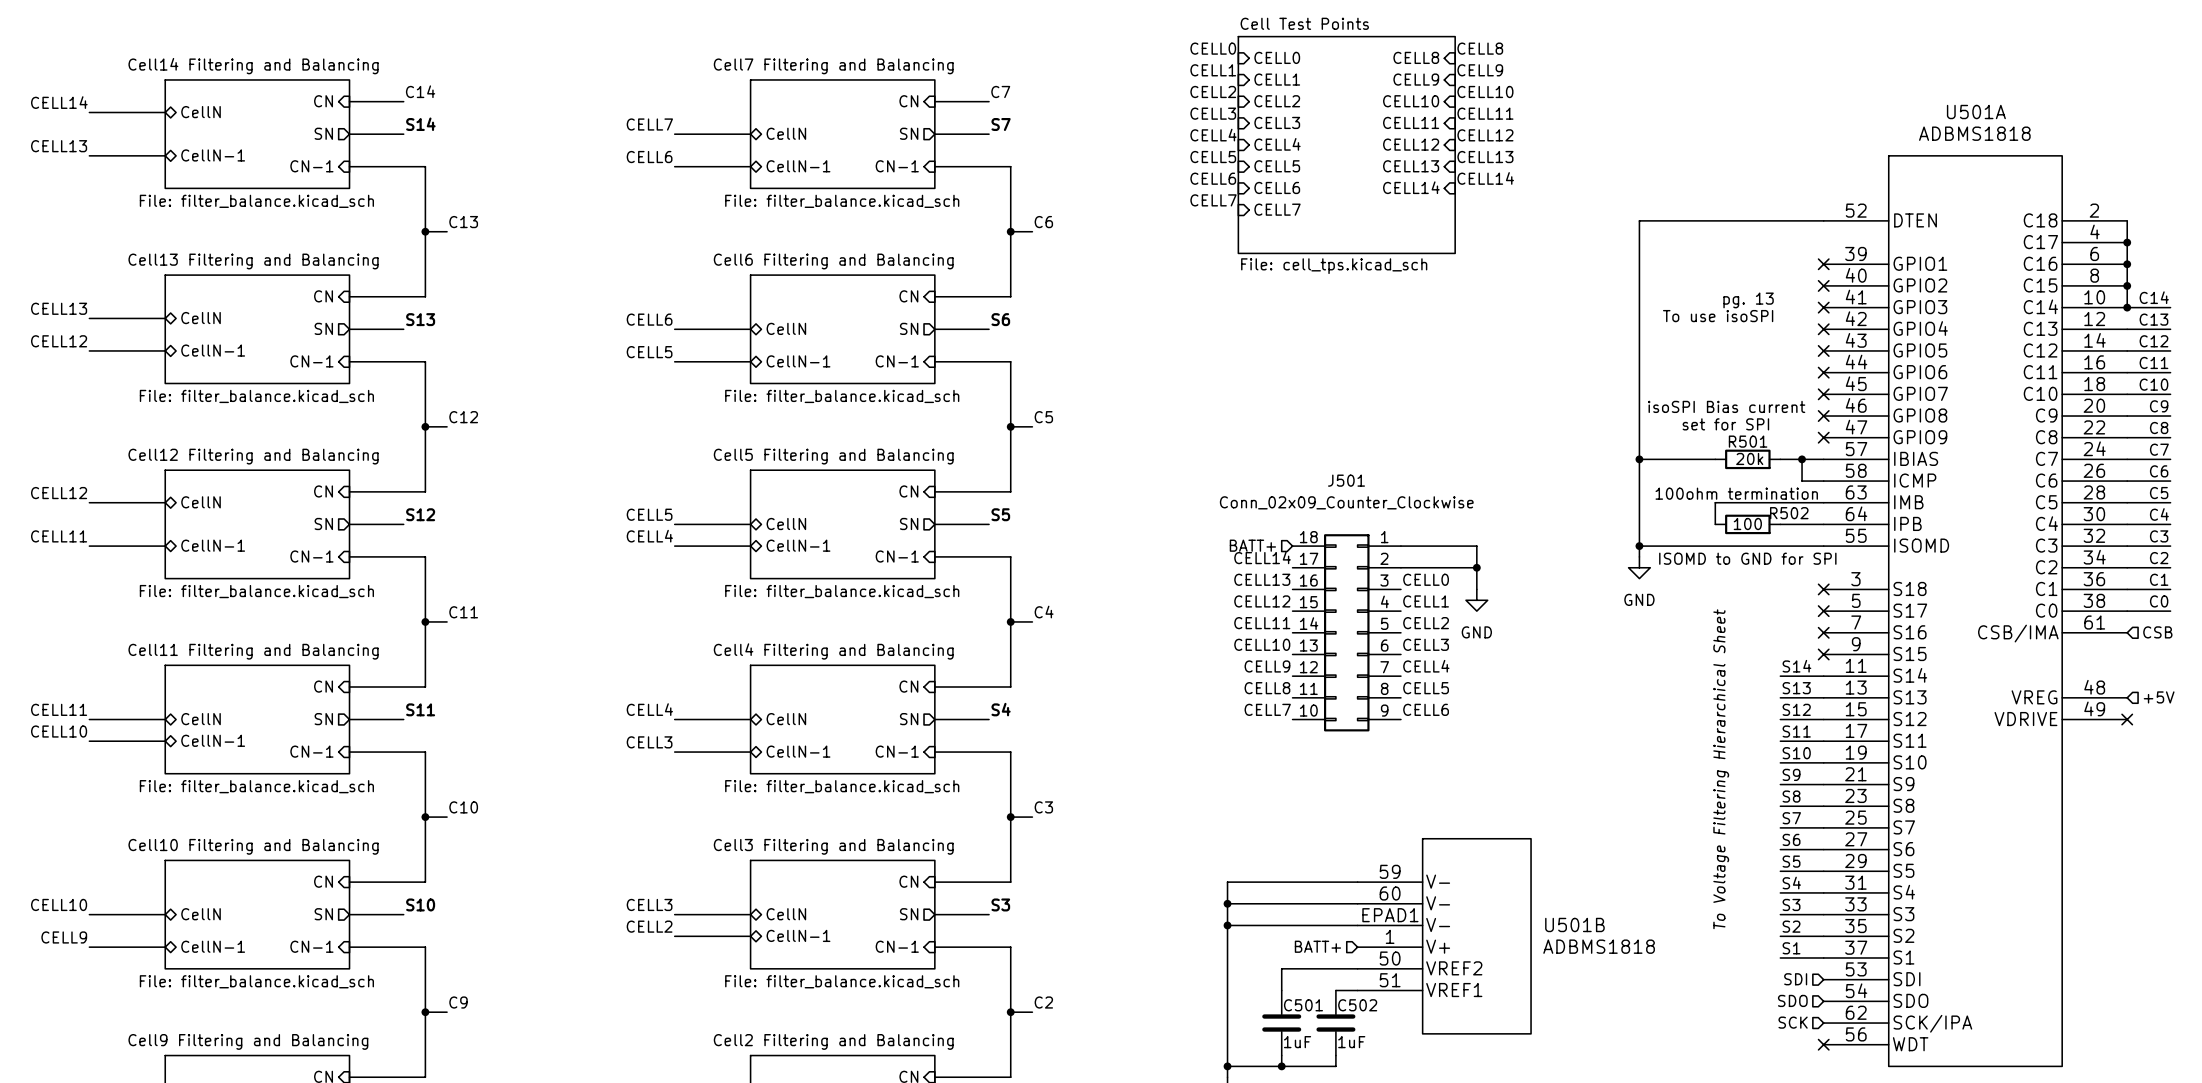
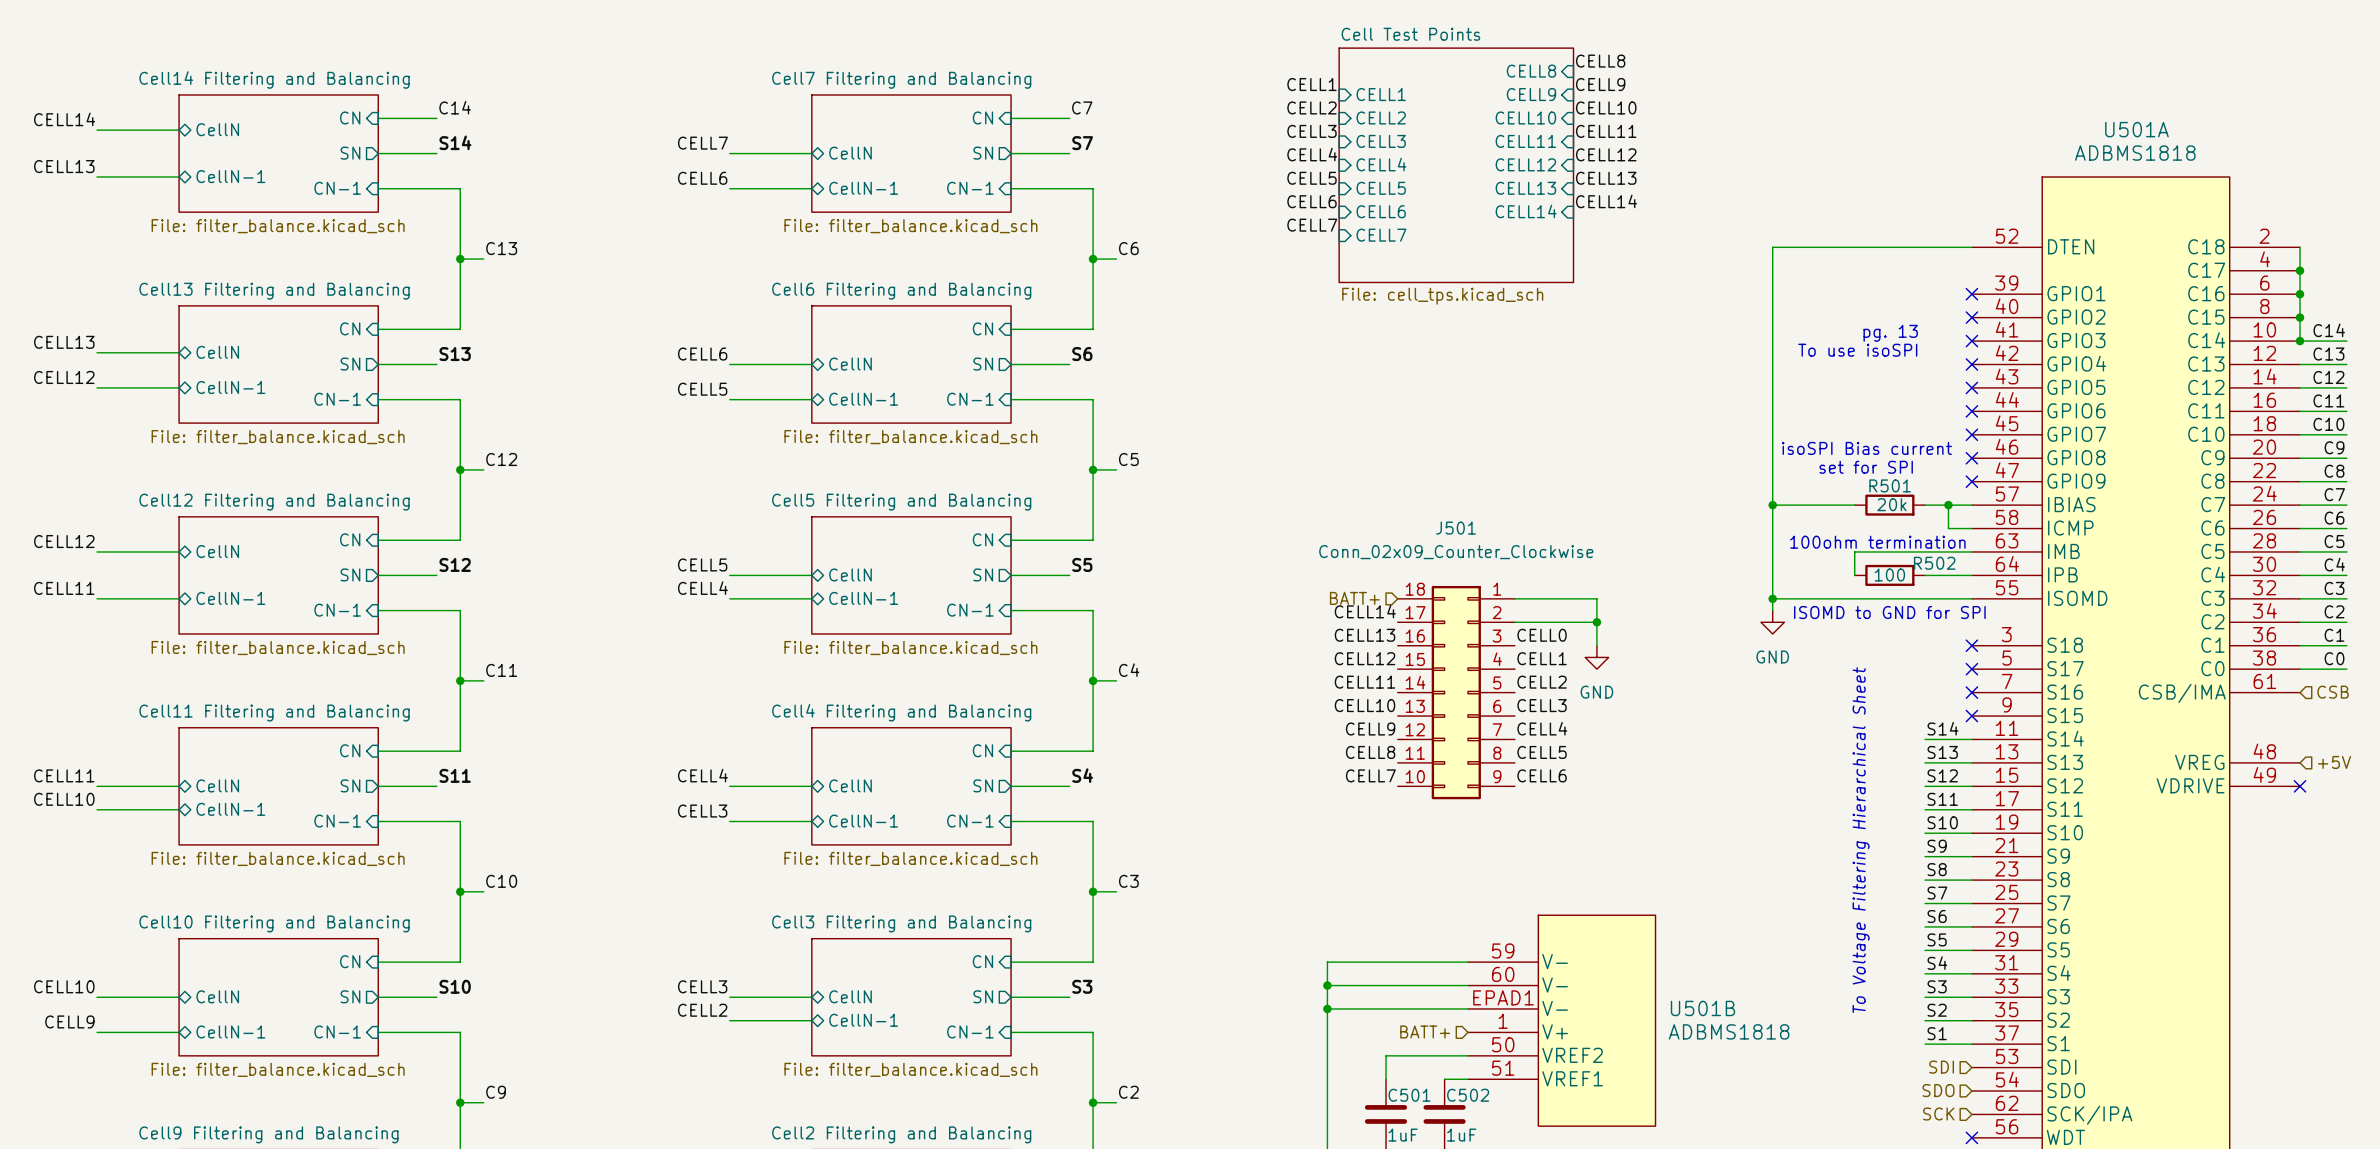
label: CELL0 (1213, 48) -> none
sheet pin: CELL0 (1277, 57) -> none

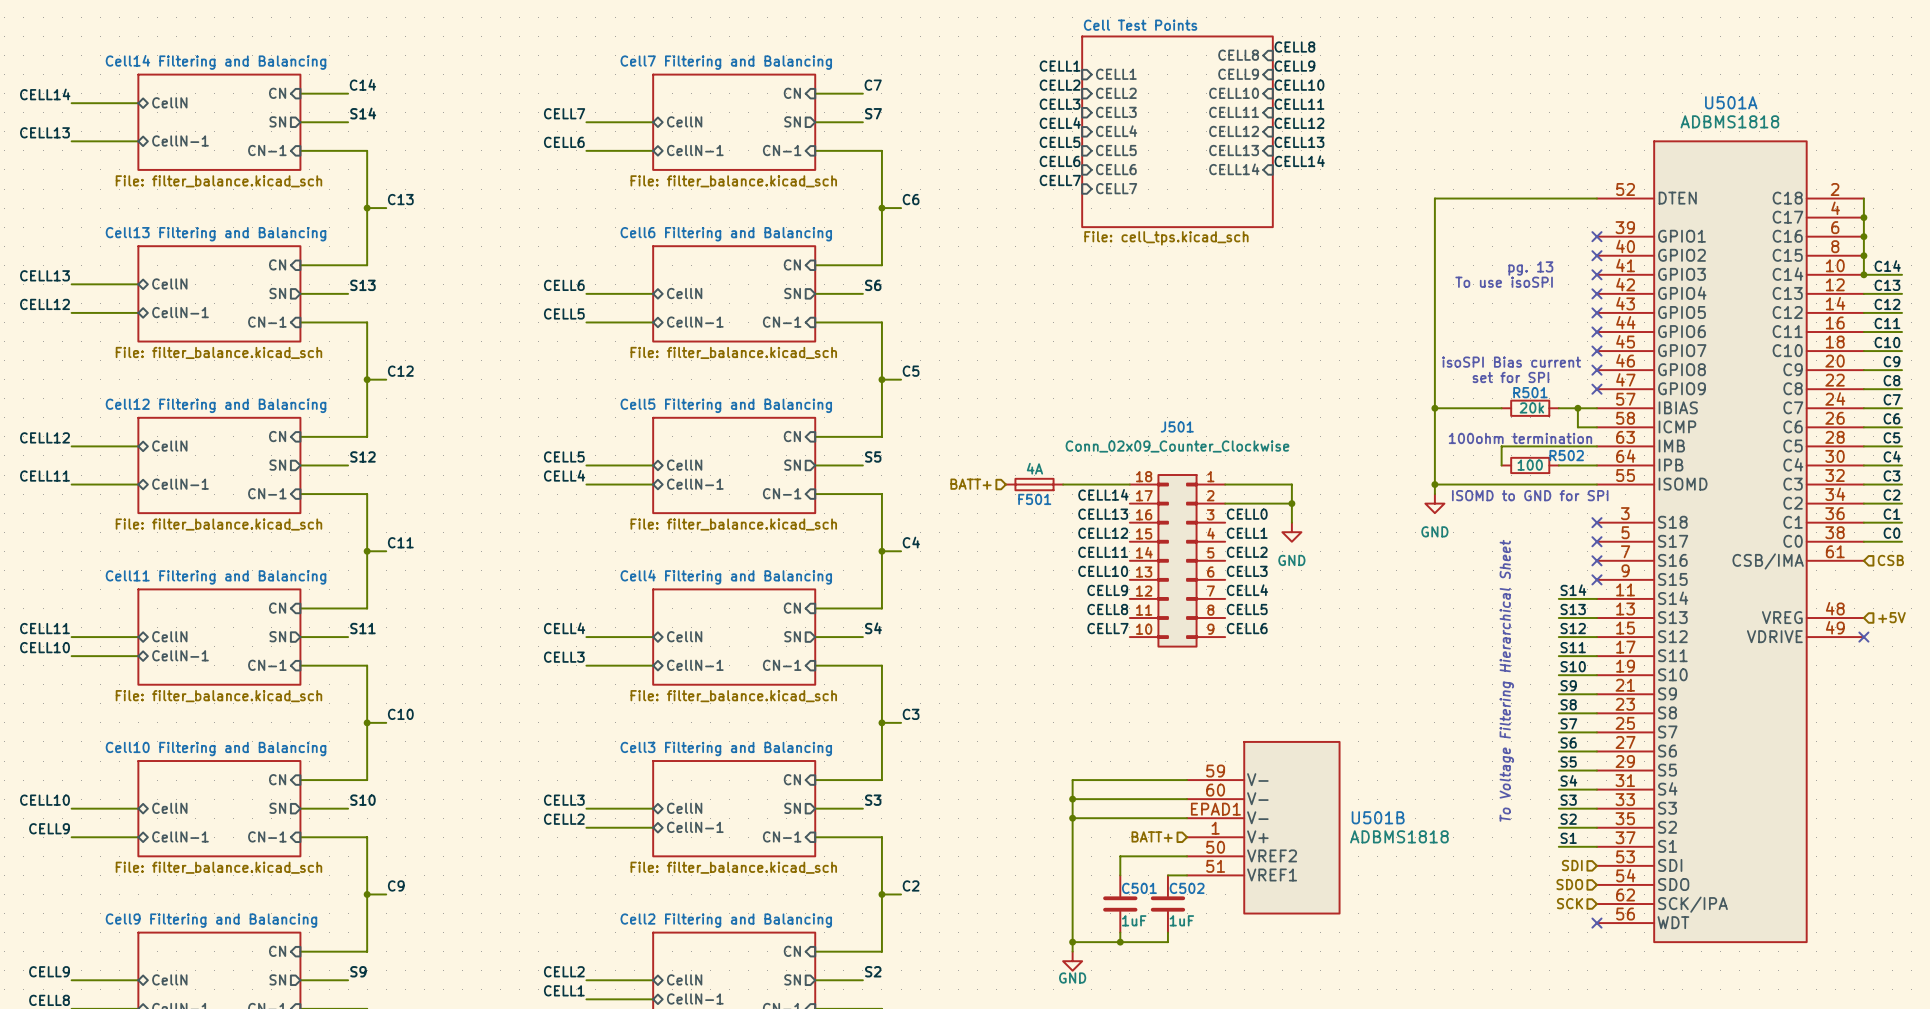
F501: none -> 4A (1034, 484)
wire: none -> (1063, 484) (1129, 484)
hierarchical label position: BATT+ (1354, 598) -> BATT+ (971, 484)

